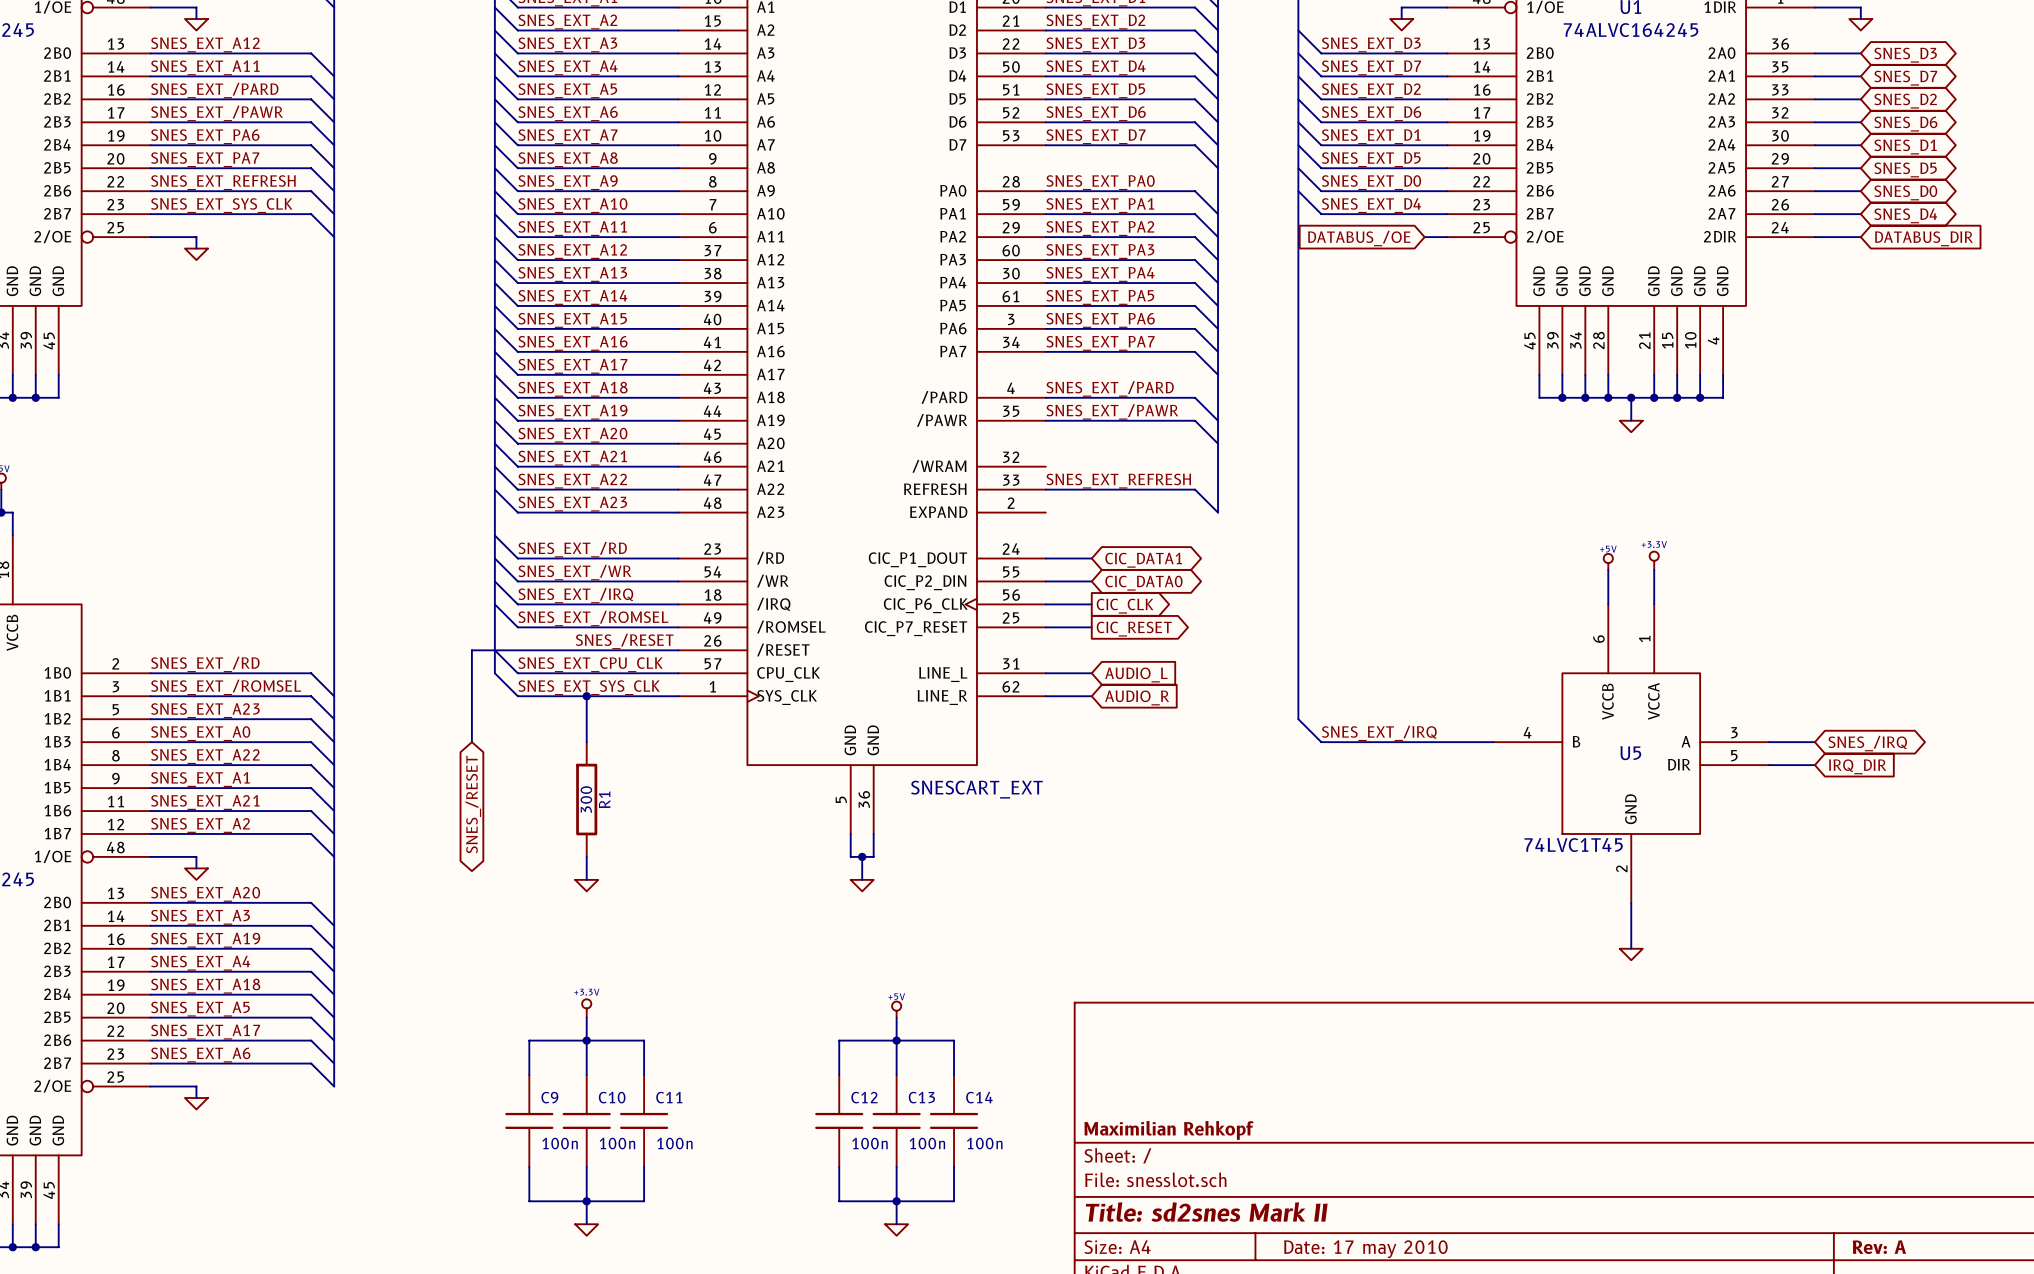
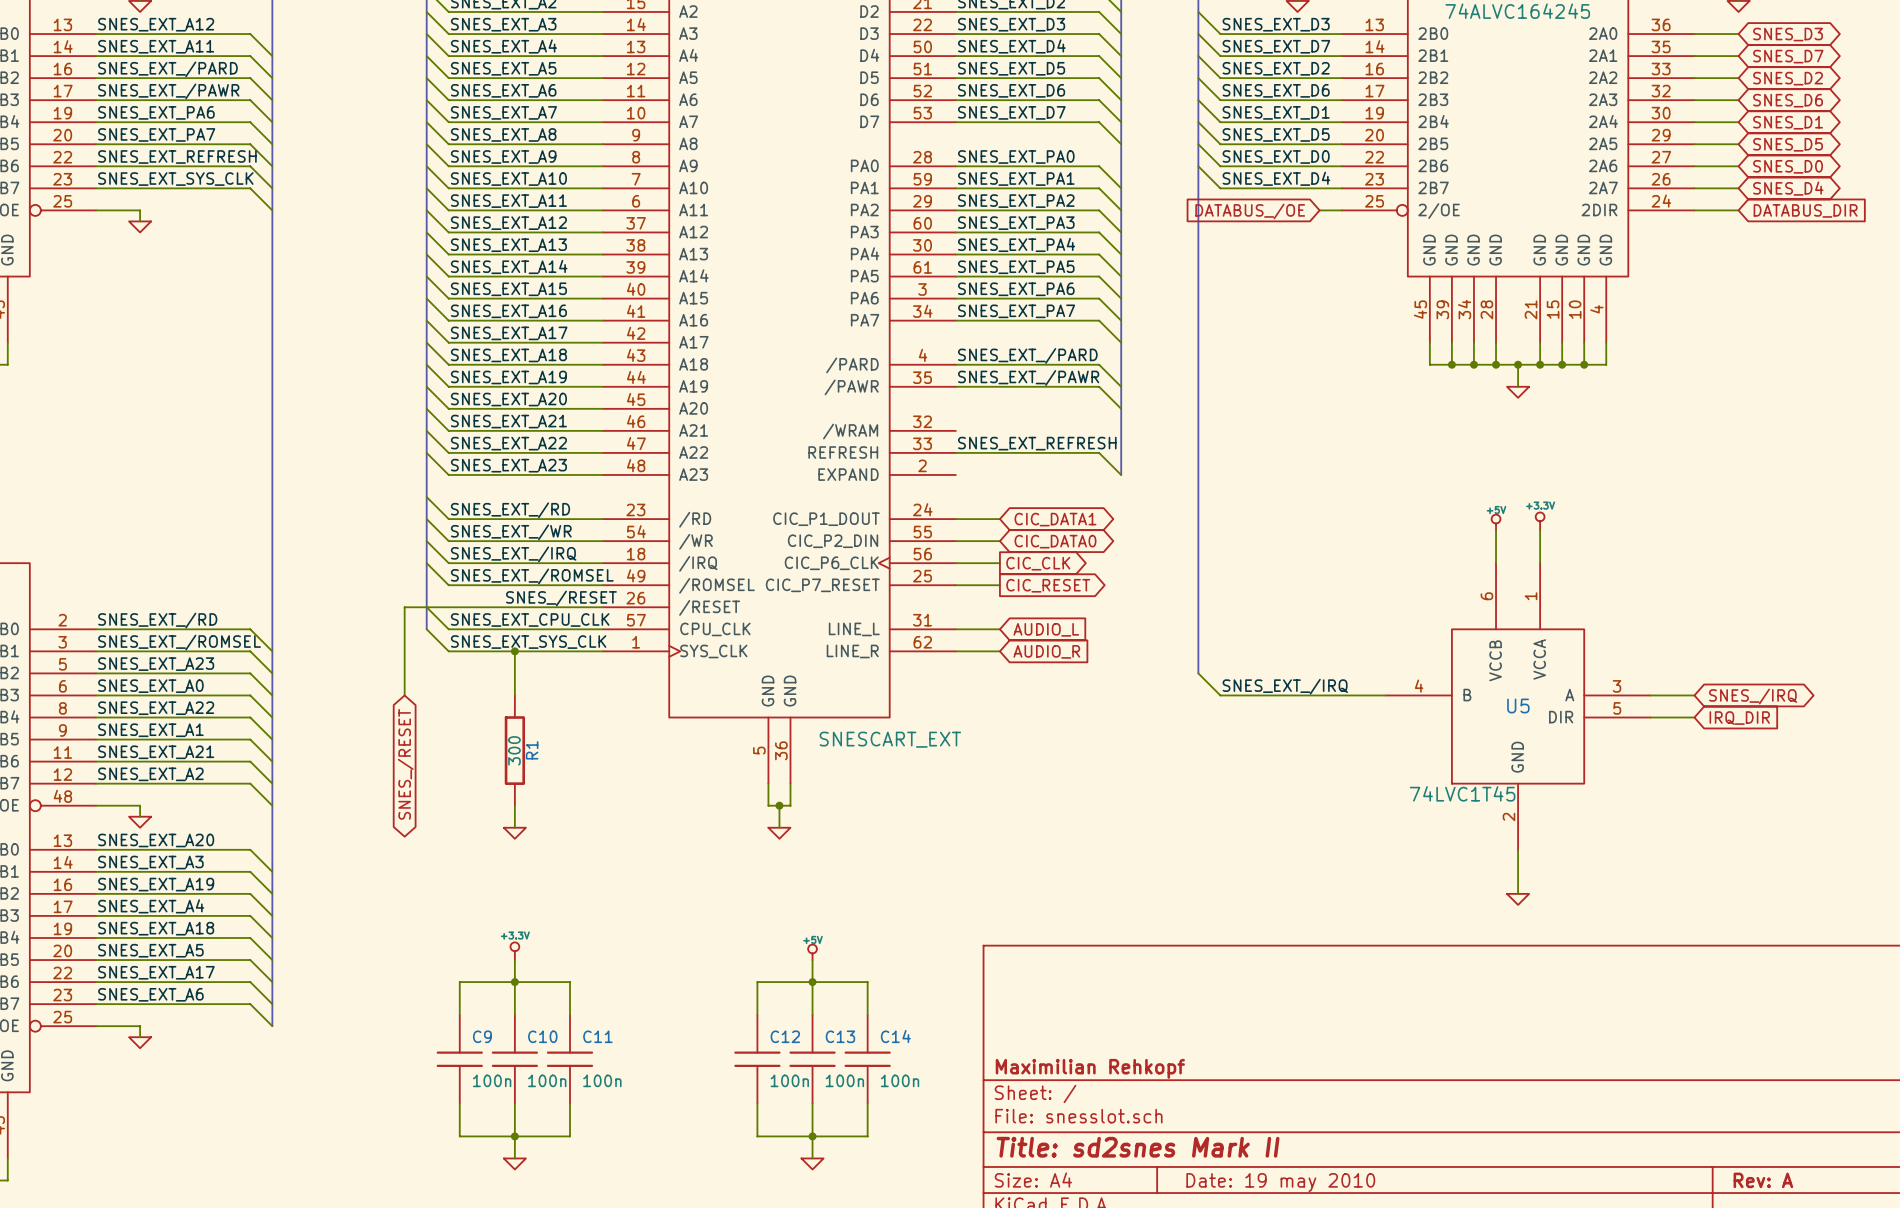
title block: Date: 17 may 2010 (1365, 1249) -> Date: 19 may 2010 (1280, 1182)

